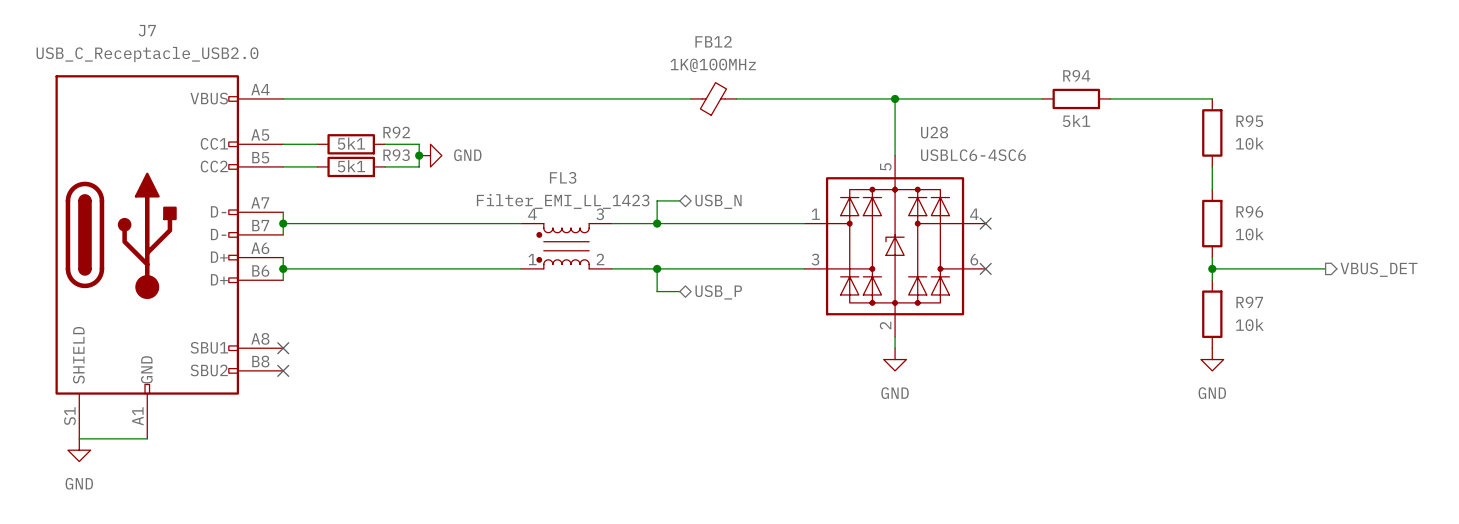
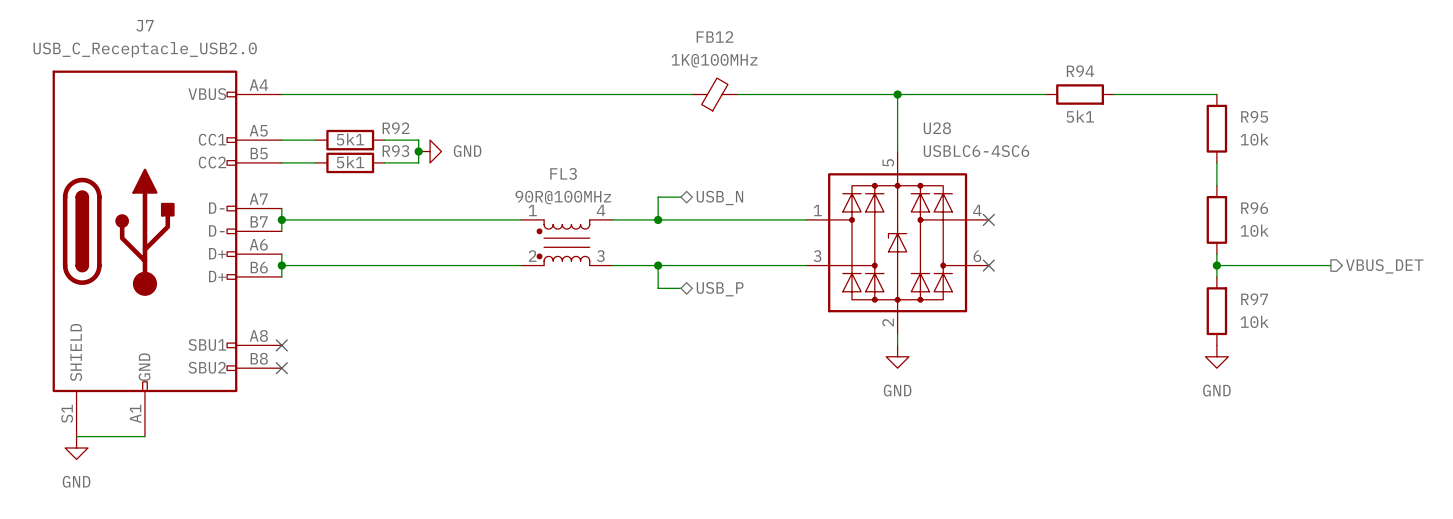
FL3 value: Filter_EMI_LL_1423 (563, 201) -> 90R@100MHz (563, 197)
FL3 pin number: 4 (532, 214) -> 1 (532, 210)
FL3 pin number: 3 (600, 214) -> 4 (601, 210)
FL3 pin number: 1 (532, 259) -> 2 (532, 256)
FL3 pin number: 2 (600, 259) -> 3 (600, 256)

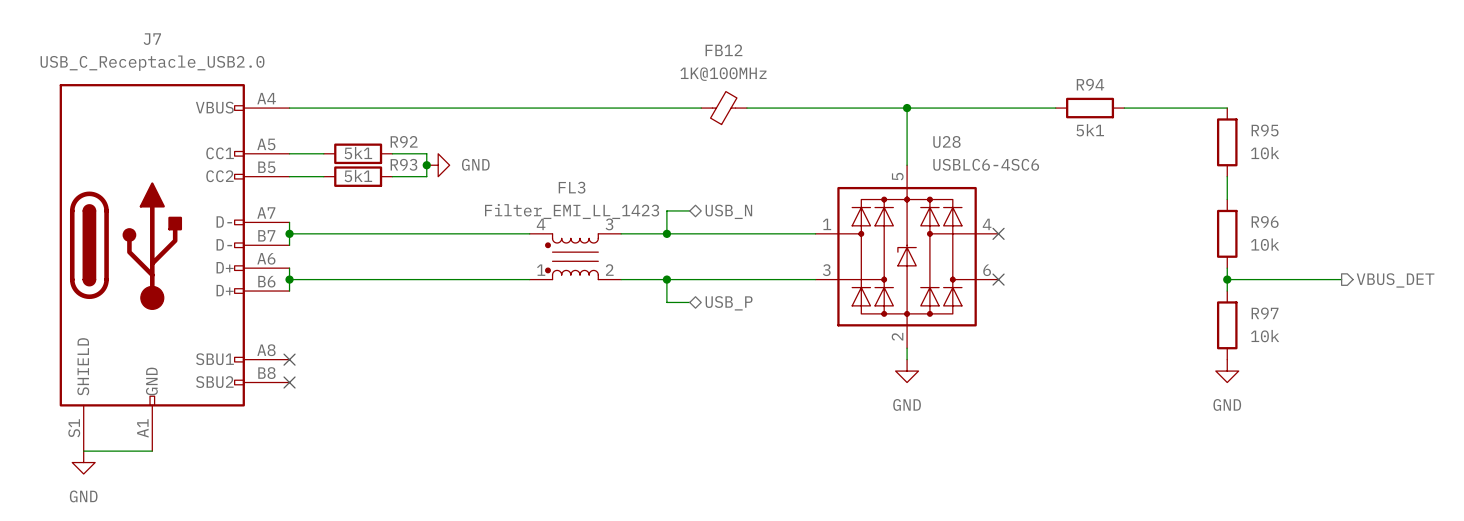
FL3 value: 90R@100MHz (563, 197) -> Filter_EMI_LL_1423 (572, 211)
FL3 pin number: 1 (532, 210) -> 4 (541, 224)
FL3 pin number: 4 (601, 210) -> 3 (609, 224)
FL3 pin number: 2 (532, 256) -> 1 (541, 270)
FL3 pin number: 3 (600, 256) -> 2 (609, 270)

